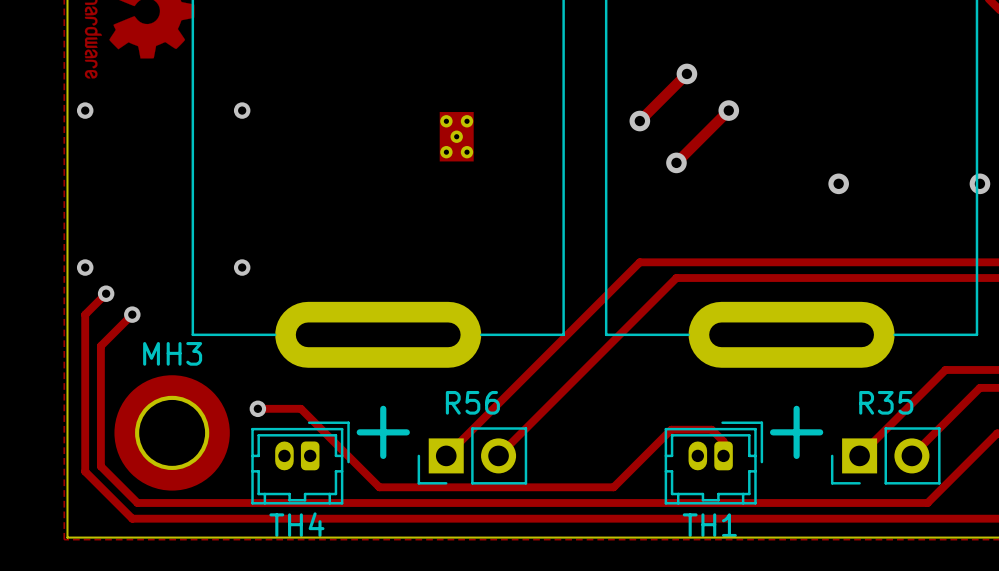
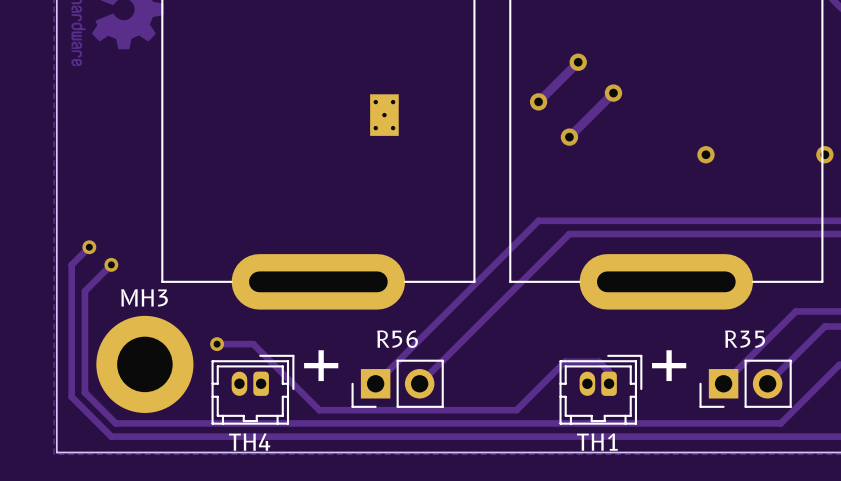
via: (85, 110) -> none
via: (242, 110) -> none
via: (85, 267) -> none
via: (242, 267) -> none

